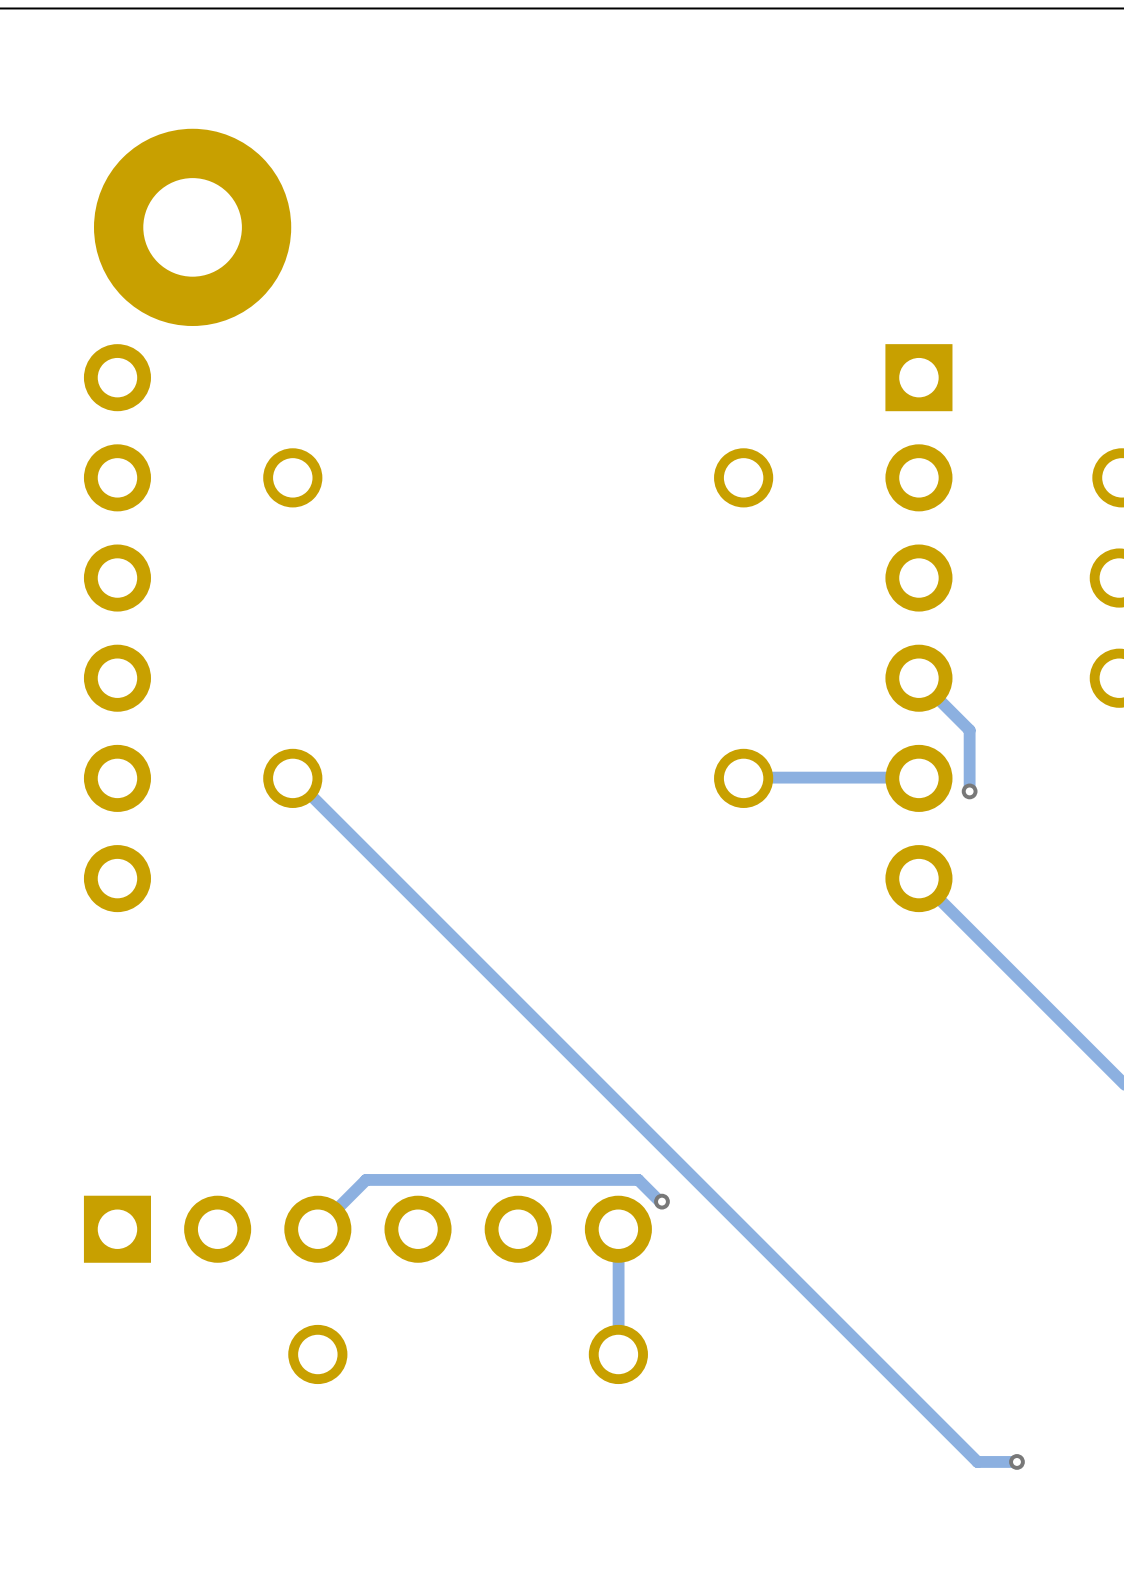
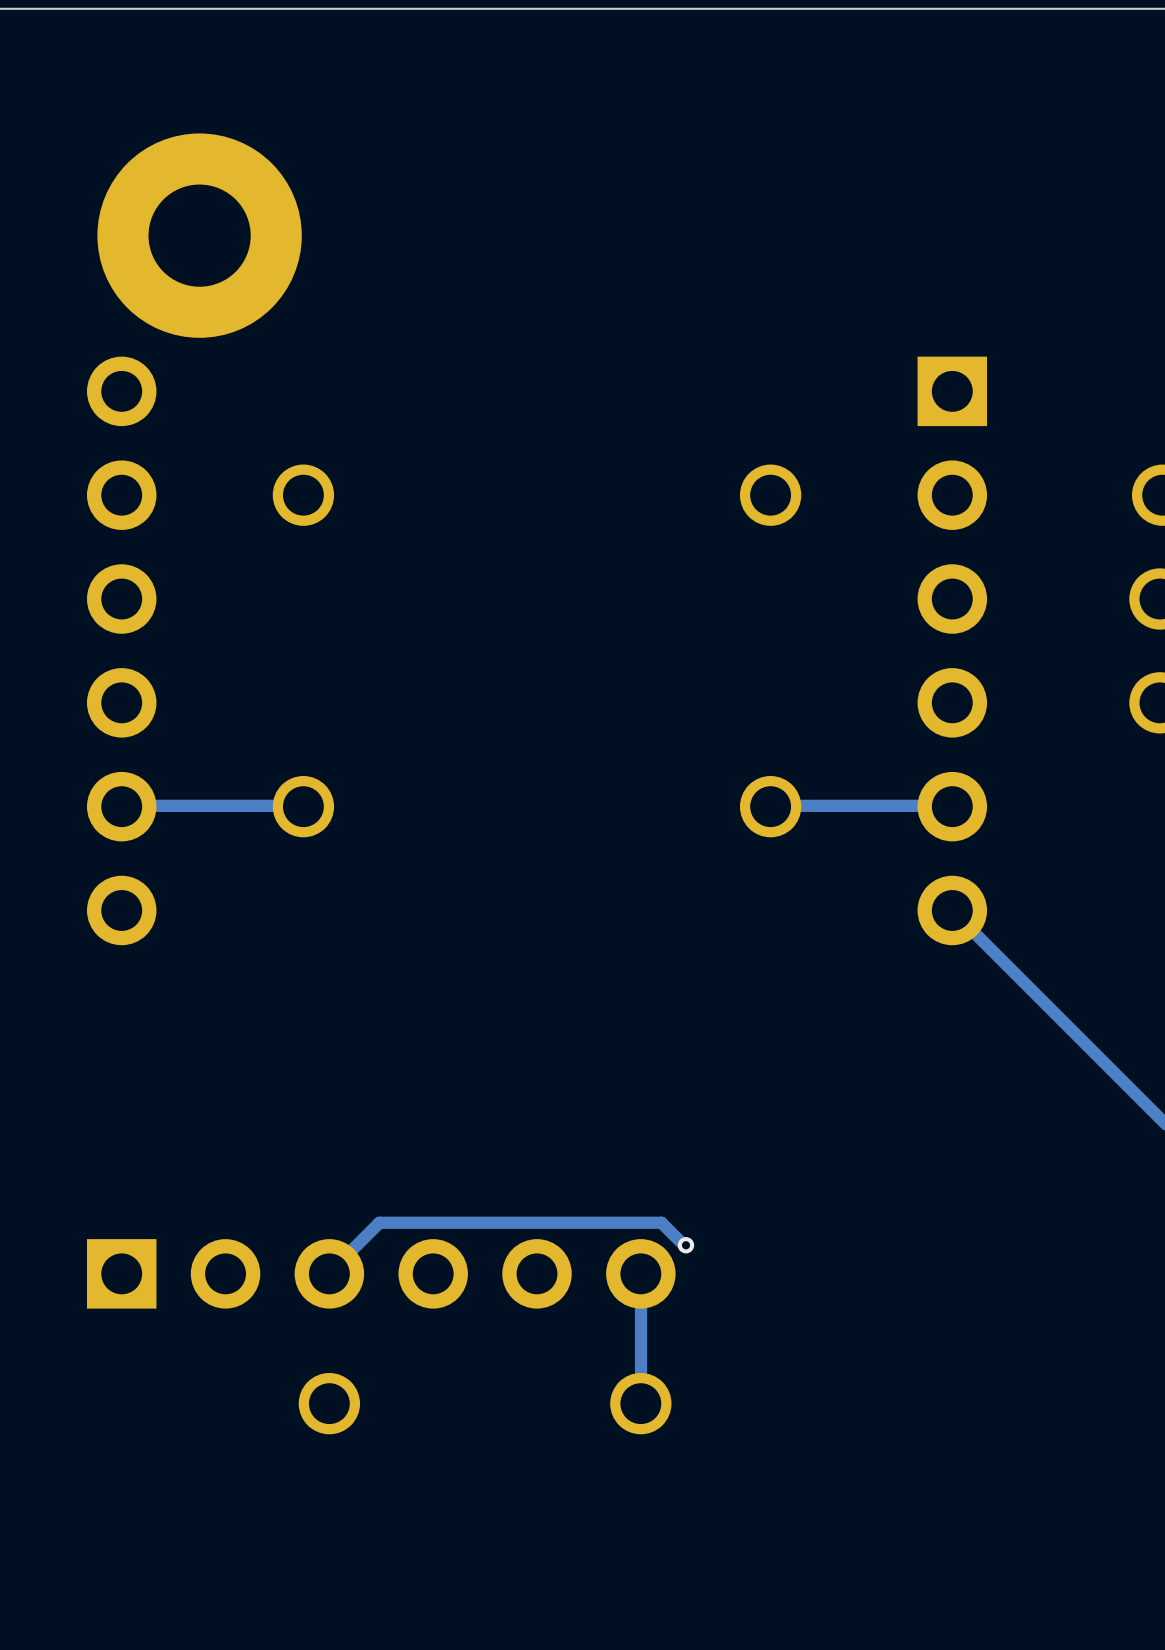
track: (918, 679) (969, 730) (969, 791) -> none
track: (293, 777) (977, 1461) (1016, 1461) -> (303, 805) (121, 805)
via: (969, 791) -> none
via: (1016, 1461) -> none

